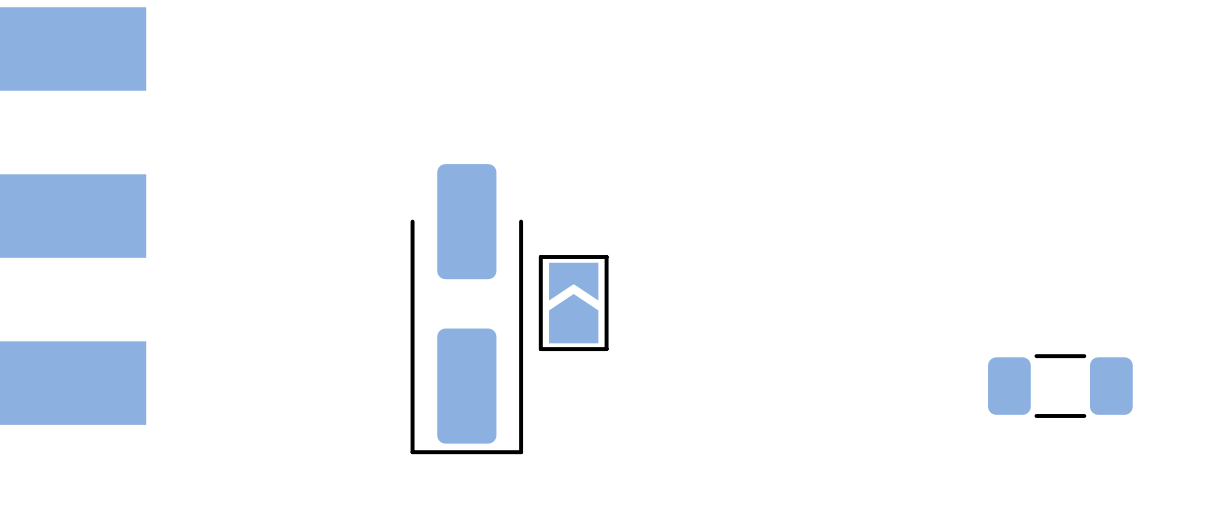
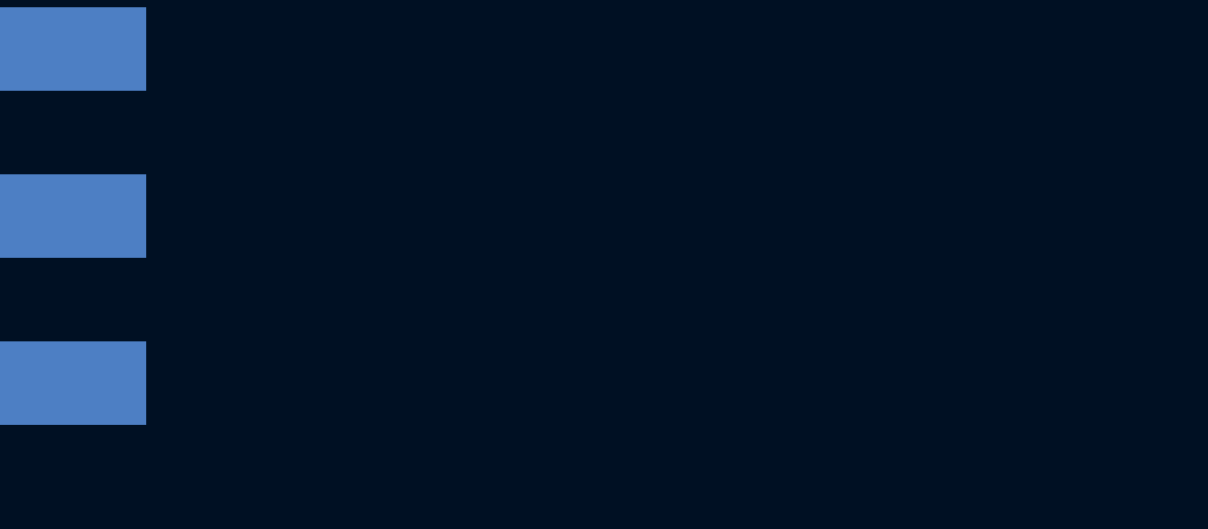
part: (573, 303) -> none
part: (466, 309) -> none
part: (1060, 386) -> none

